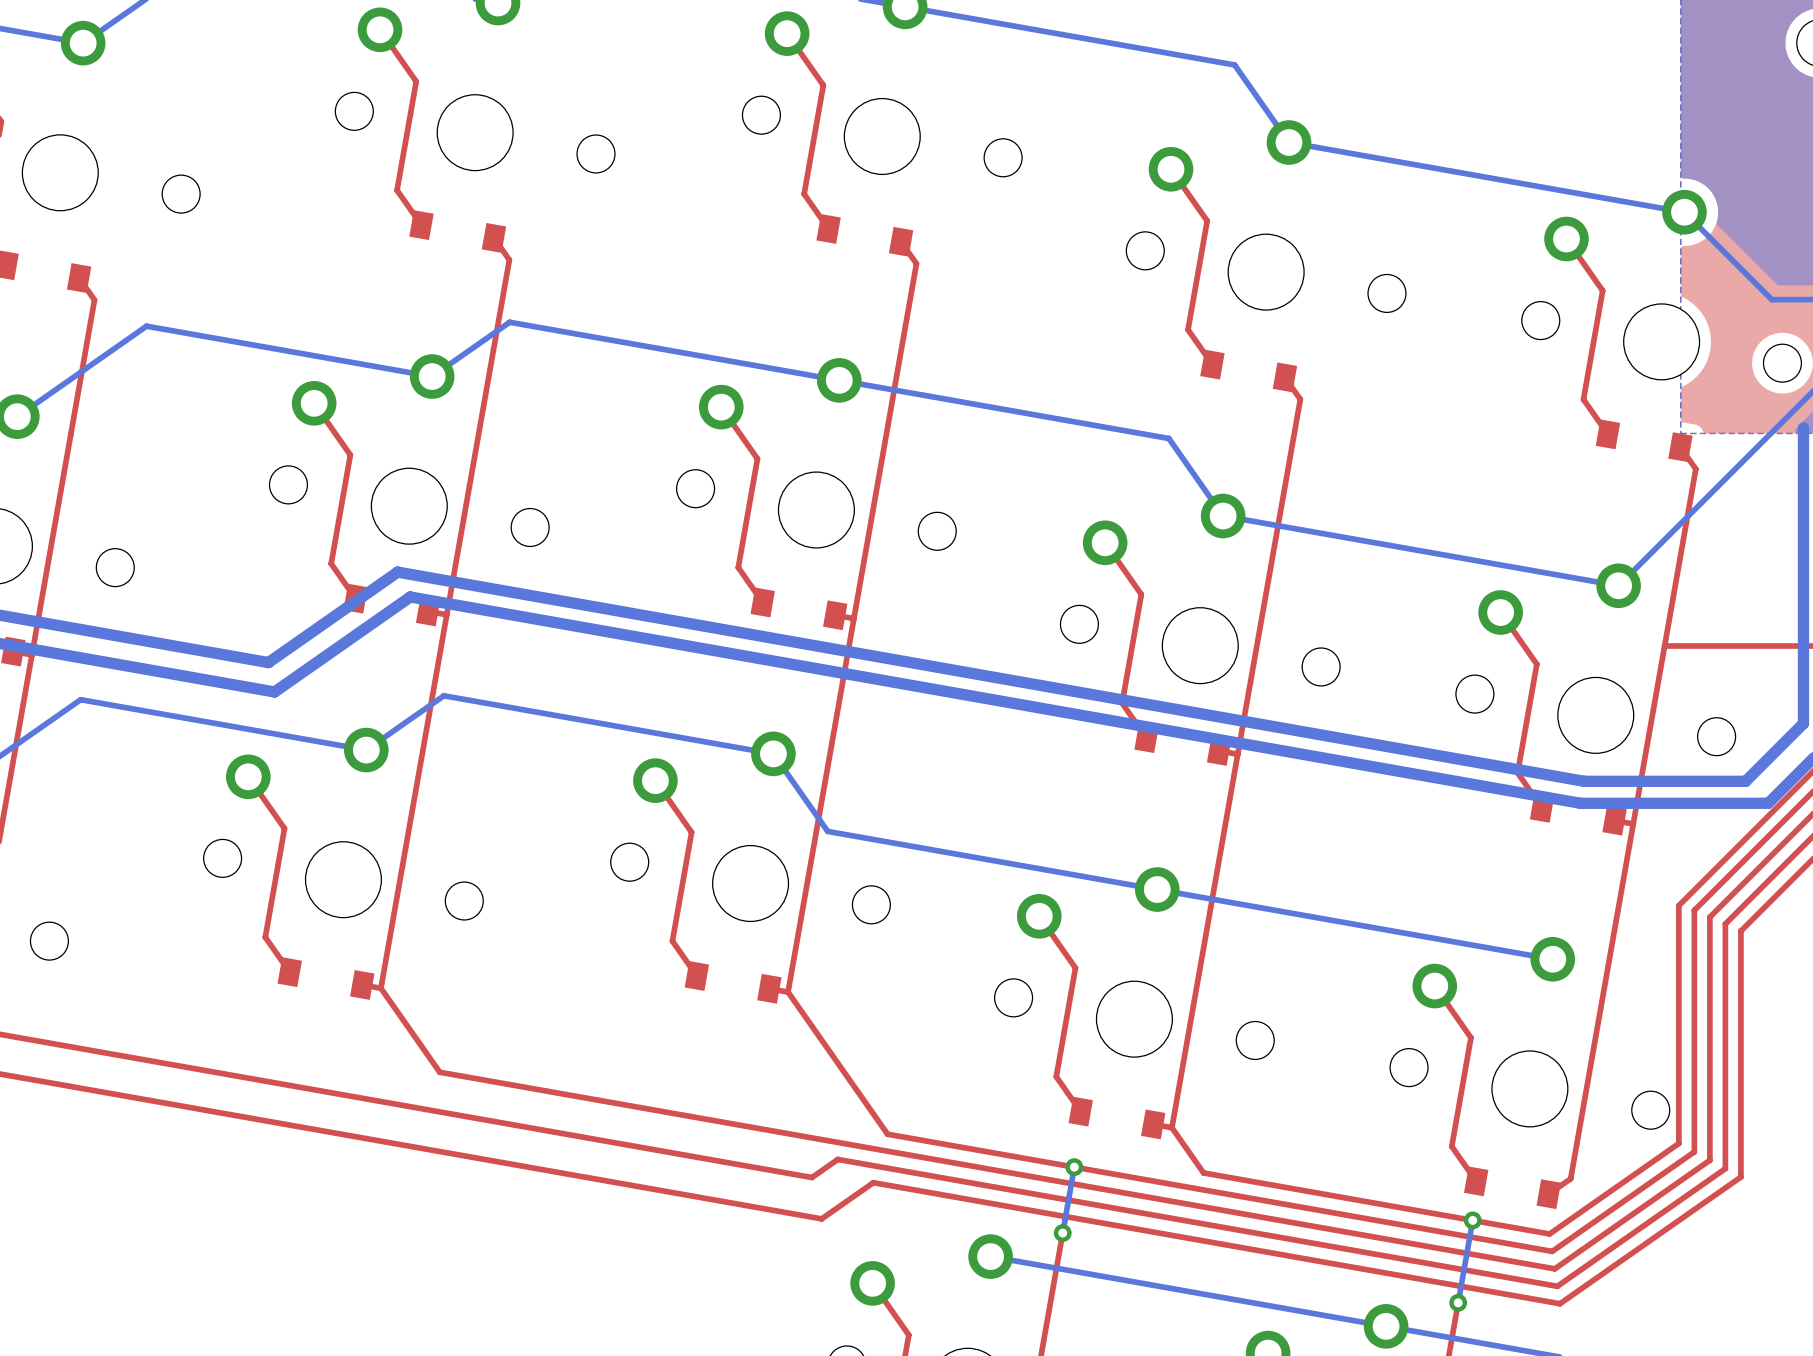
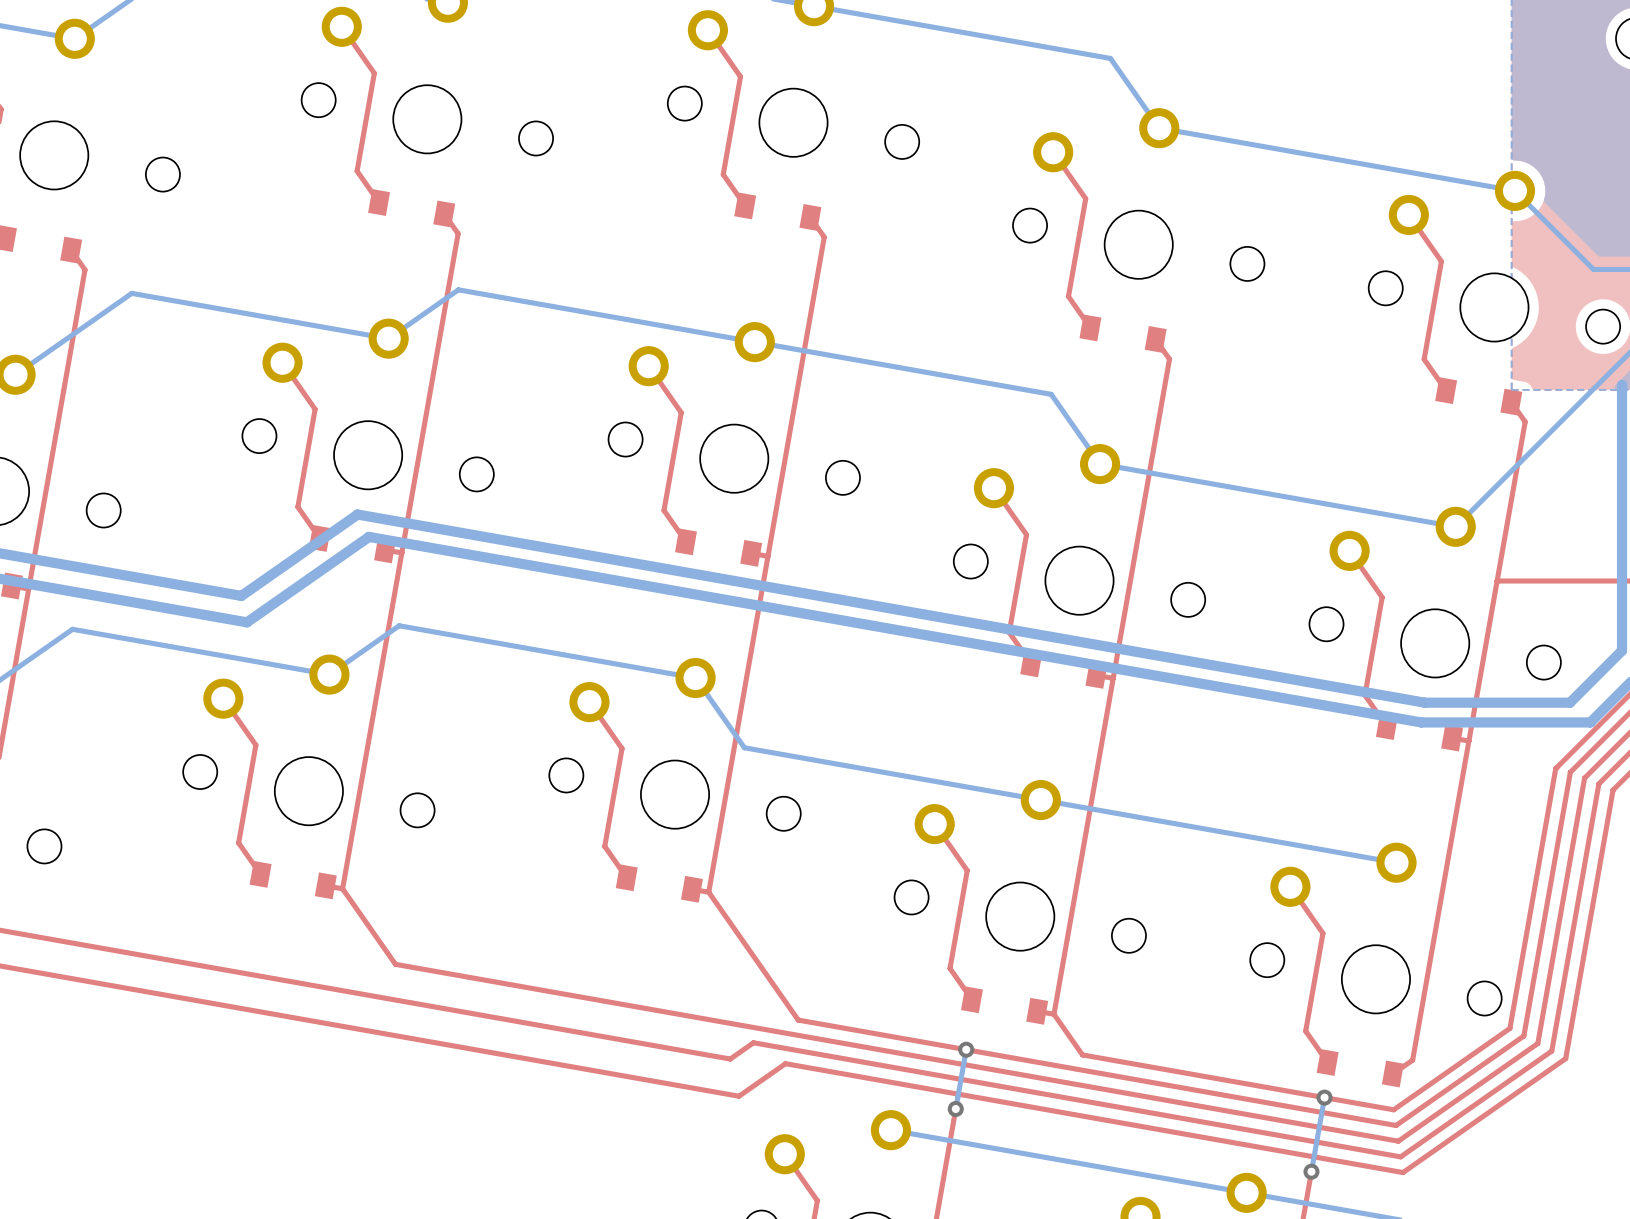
top track: (1730, 853) (1678, 905) (1678, 1143) -> (1556, 767) (1509, 1028)
top track: (1746, 858) (1694, 910) (1694, 1151) -> (1570, 772) (1523, 1035)
top track: (1761, 865) (1709, 917) (1709, 1160) -> (1584, 778) (1537, 1043)
top track: (1777, 871) (1725, 923) (1725, 1168) -> (1598, 784) (1551, 1051)
top track: (1793, 878) (1740, 931) (1740, 1177) -> (1613, 790) (1565, 1058)

